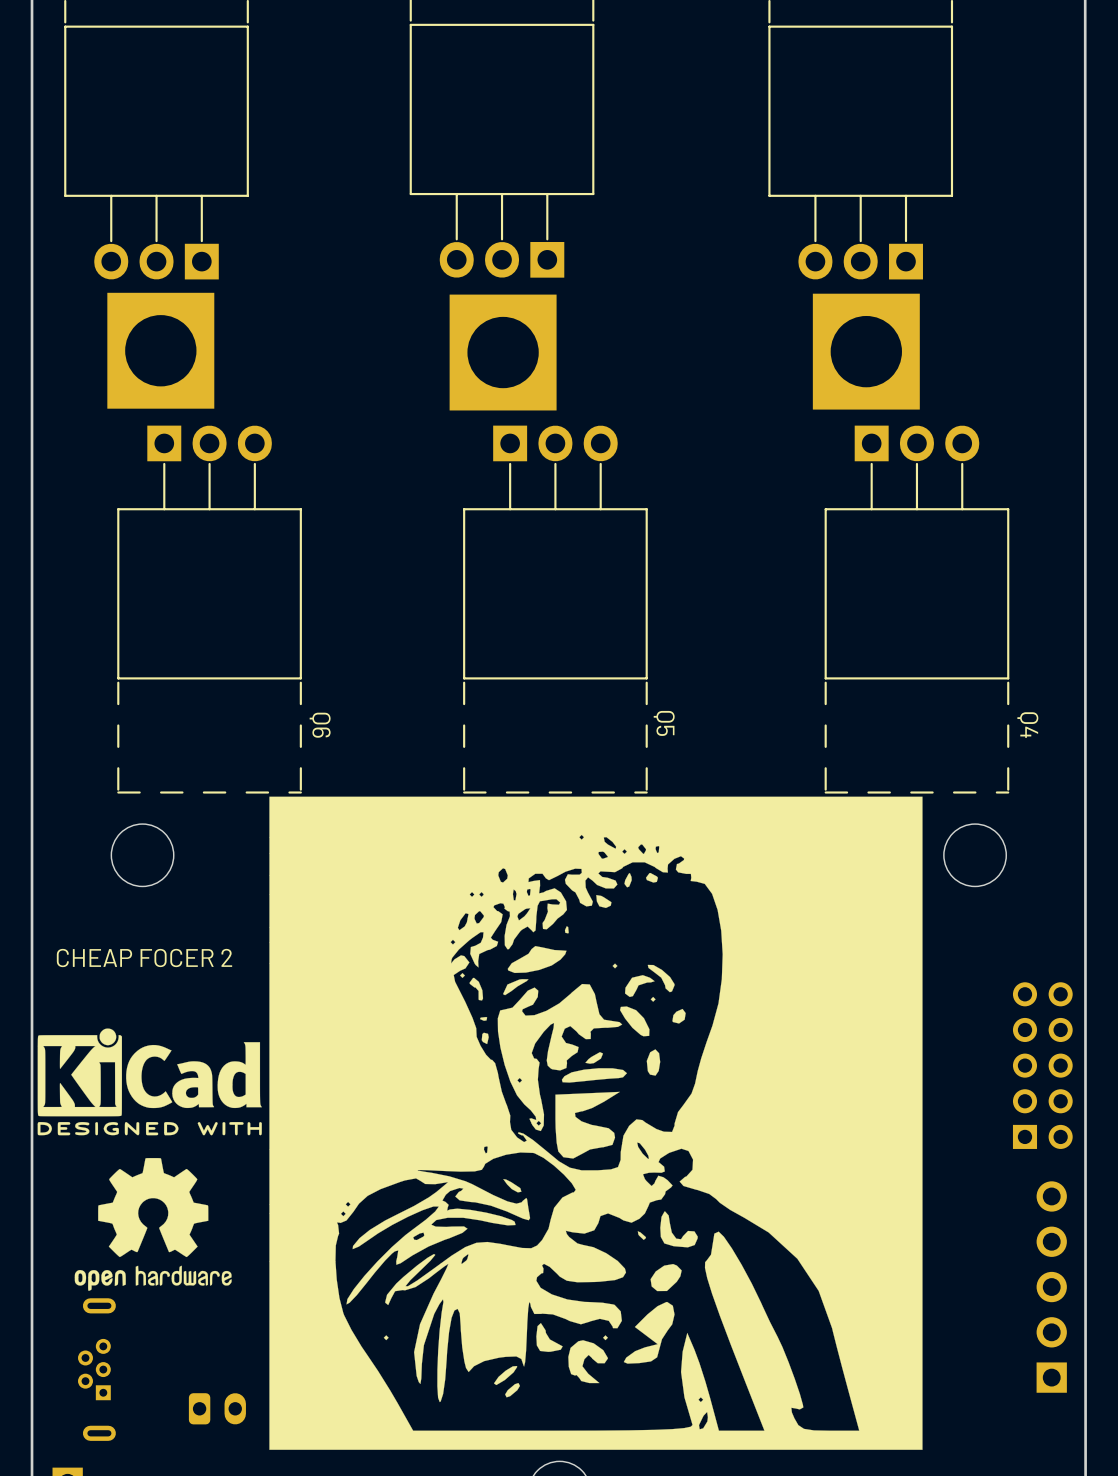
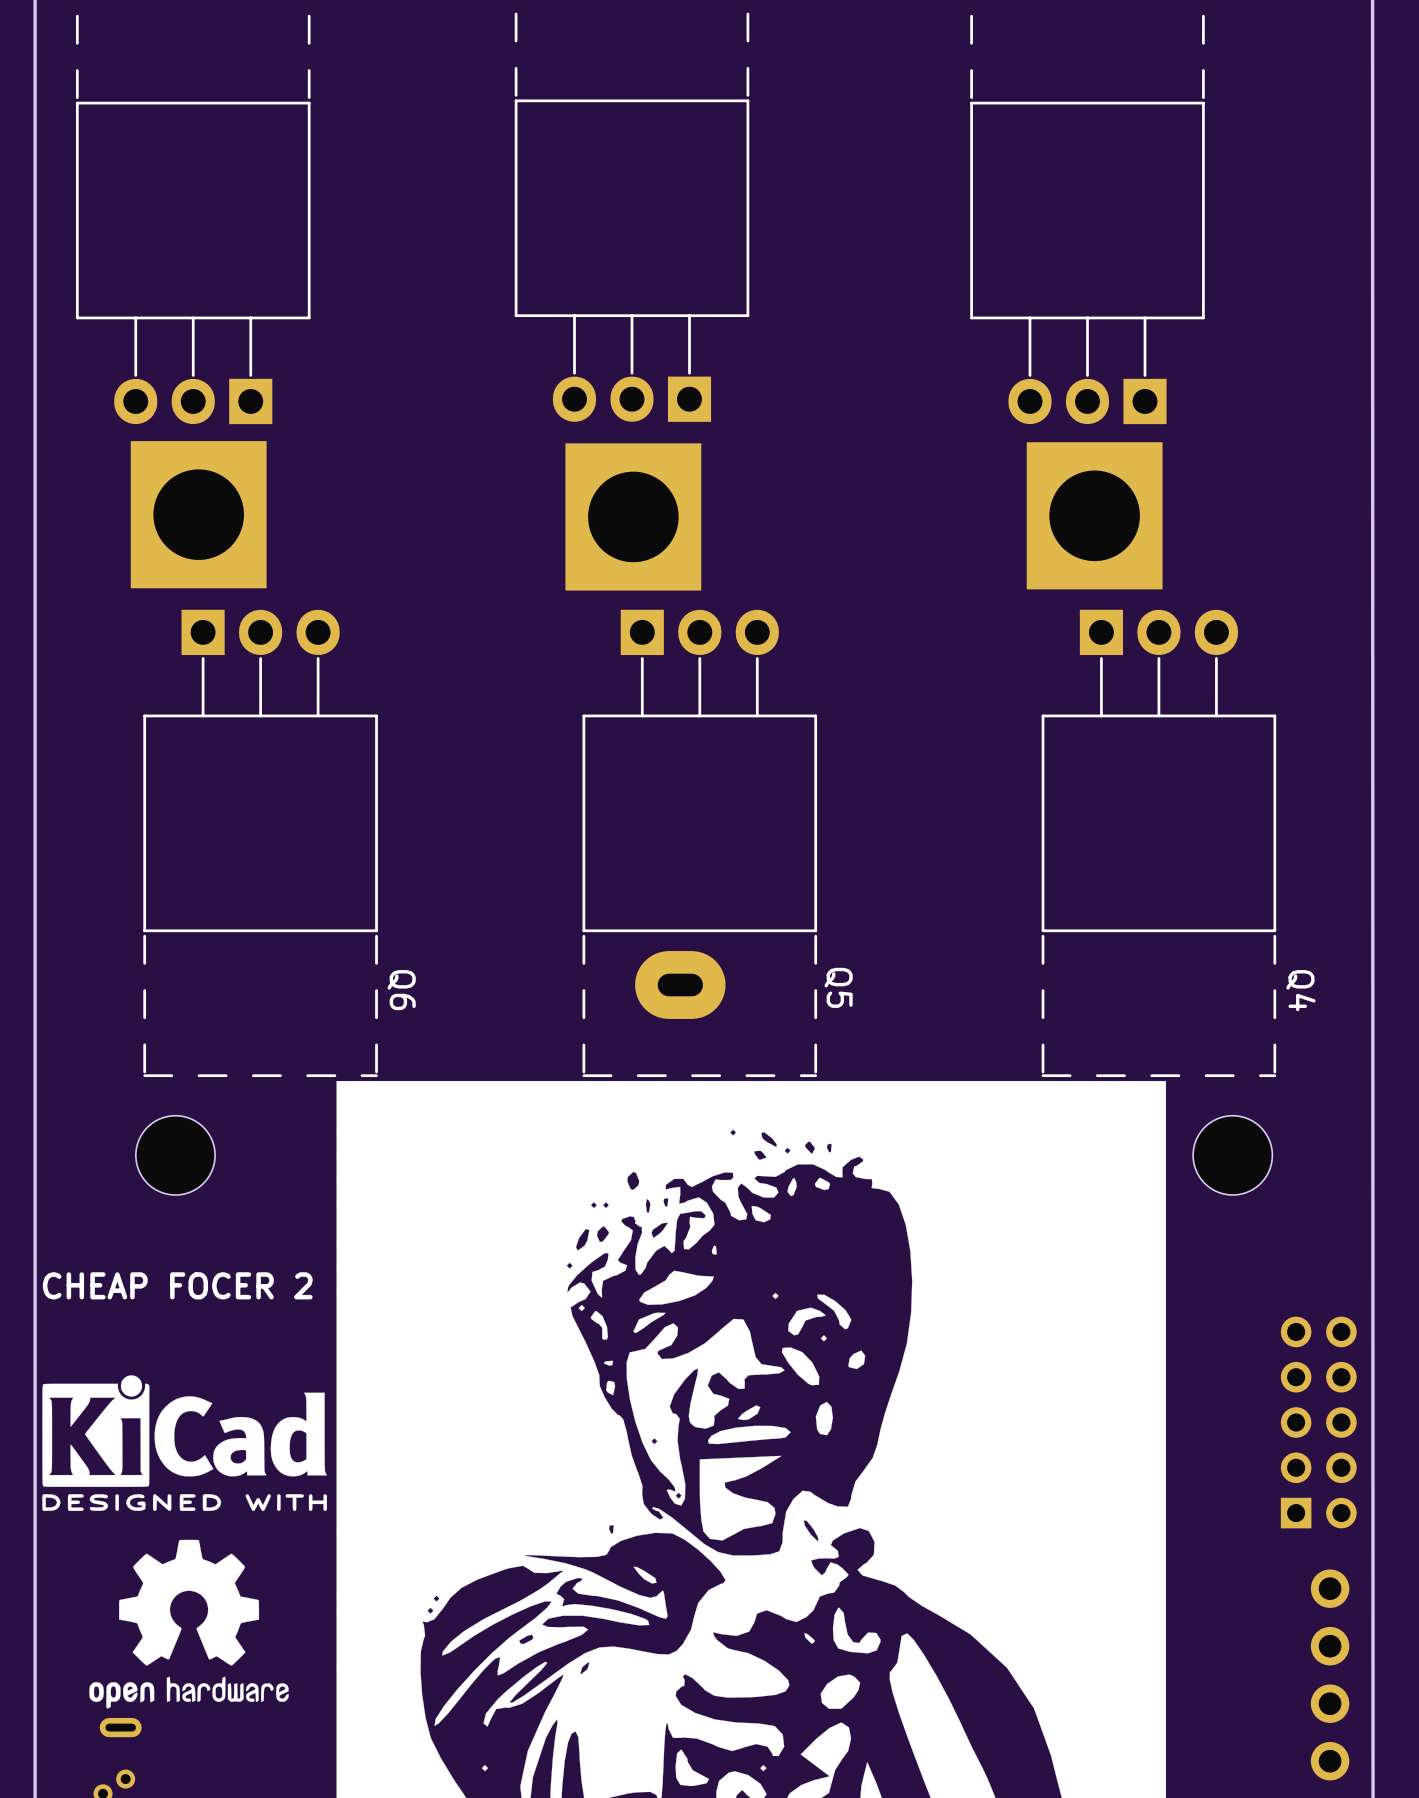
part: none -> (680, 985)

